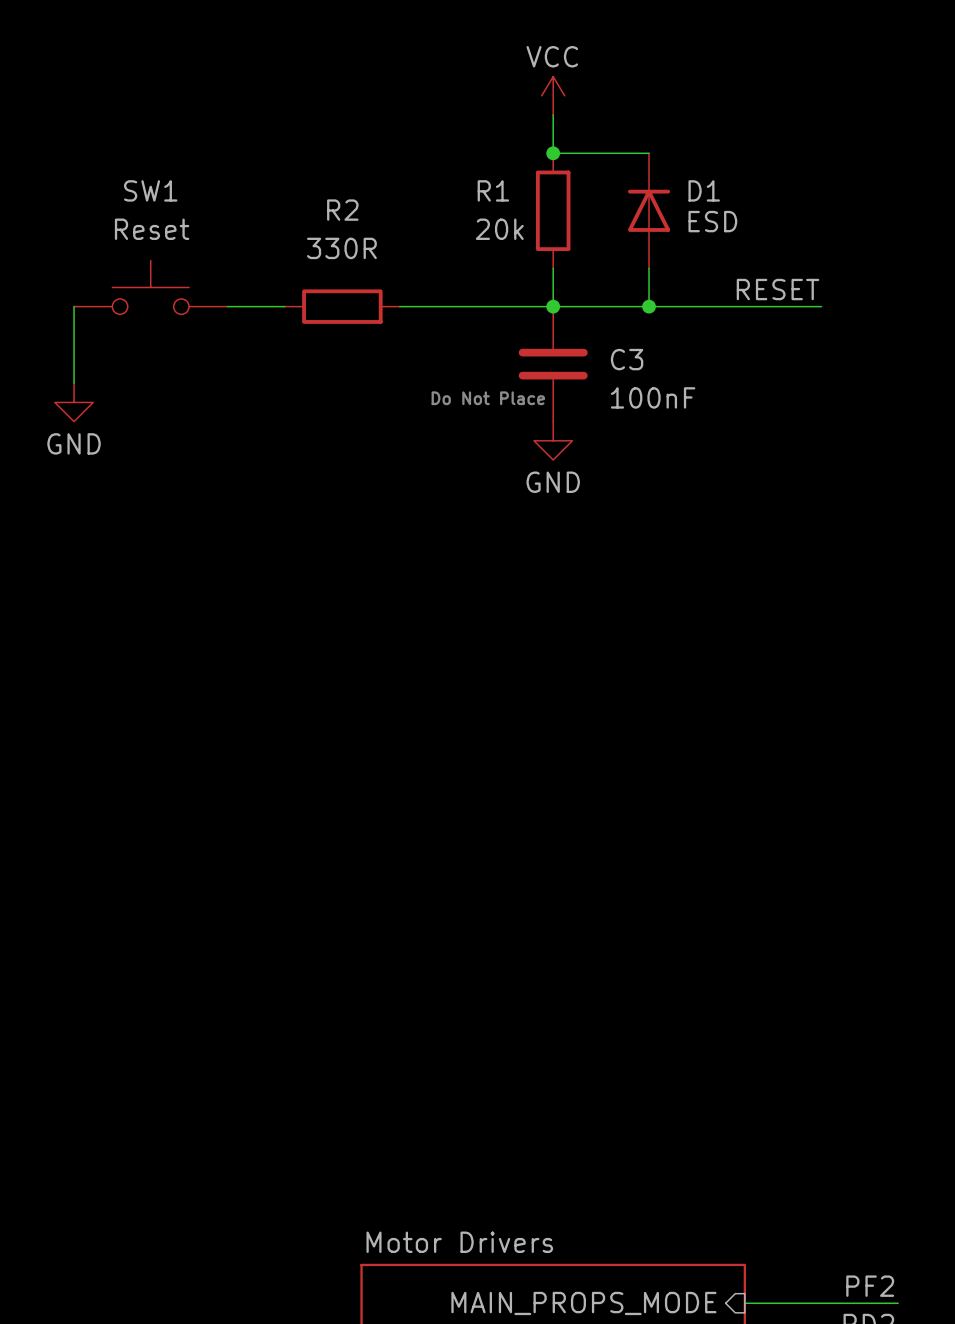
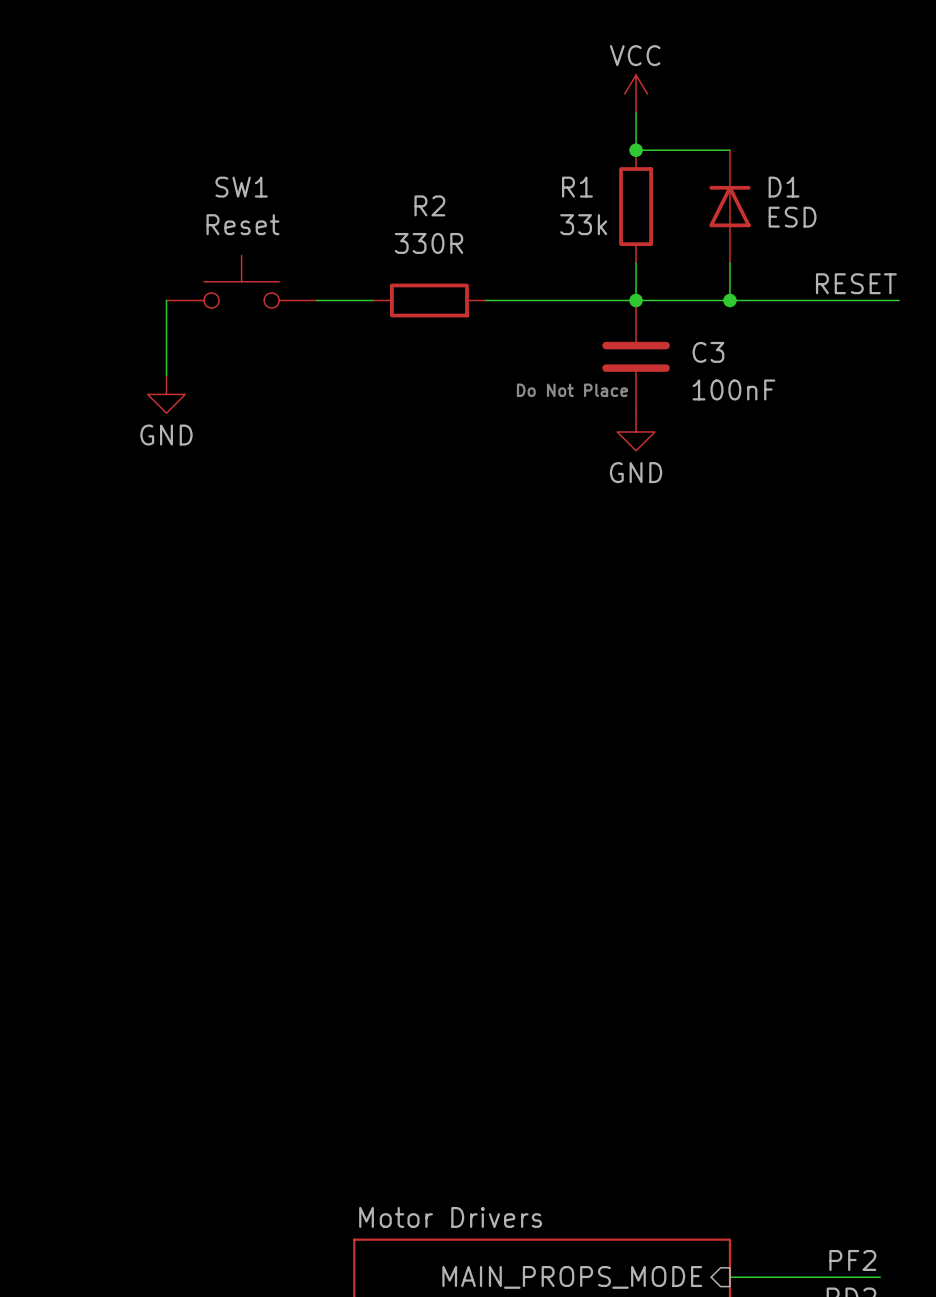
power symbol position: VCC (553, 95) -> VCC (636, 93)
wire: (553, 114) (553, 153) (649, 153) -> (636, 112) (636, 150) (729, 150)
junction: (553, 153) -> none
junction: none -> (636, 150)
R1 position: (553, 210) -> (636, 206)
D1 position: (649, 210) -> (729, 206)
R1 value: 20k (499, 229) -> 33k (583, 224)
wire: (553, 268) (553, 306) -> (729, 262) (729, 300)
SW1 position: (150, 287) -> (241, 281)
label position: RESET (778, 289) -> RESET (856, 283)
wire: (74, 306) (74, 383) -> (166, 300) (166, 375)
wire: (227, 306) (284, 306) -> (316, 300) (373, 300)
R2 position: (342, 306) -> (429, 300)
wire: (399, 306) (495, 306) -> none
junction: (553, 306) -> none
junction: none -> (729, 300)
wire: none -> (805, 300) (899, 300)
C3 position: (553, 364) -> (636, 356)
text position: Do Not Place (488, 398) -> Do Not Place (572, 390)
power symbol position: GND (74, 402) -> GND (166, 394)
power symbol position: GND (553, 440) -> GND (636, 431)

